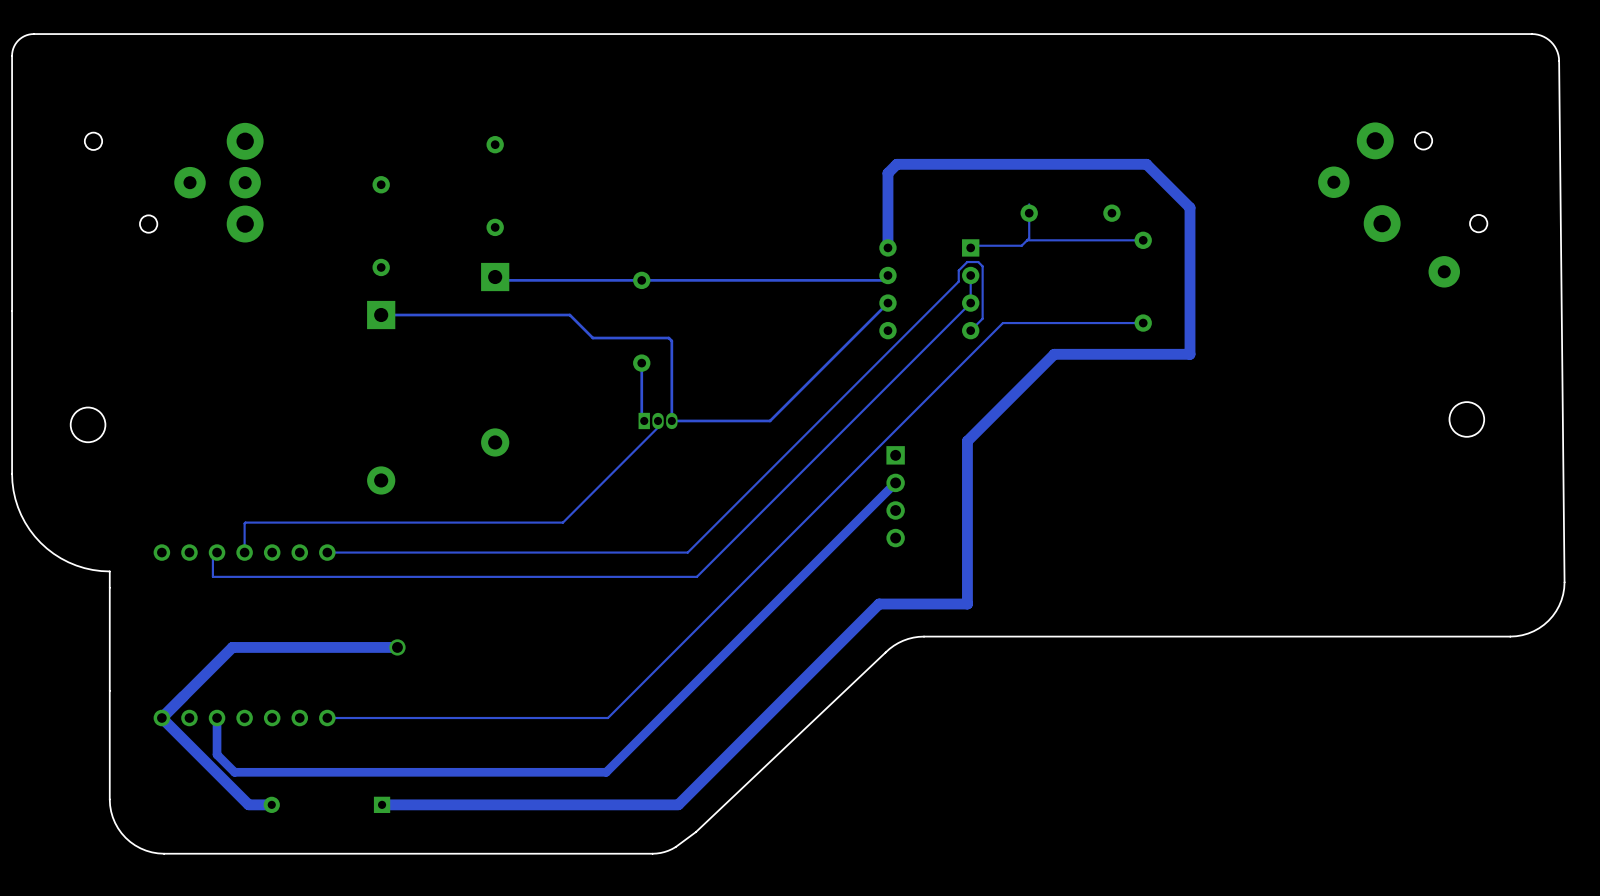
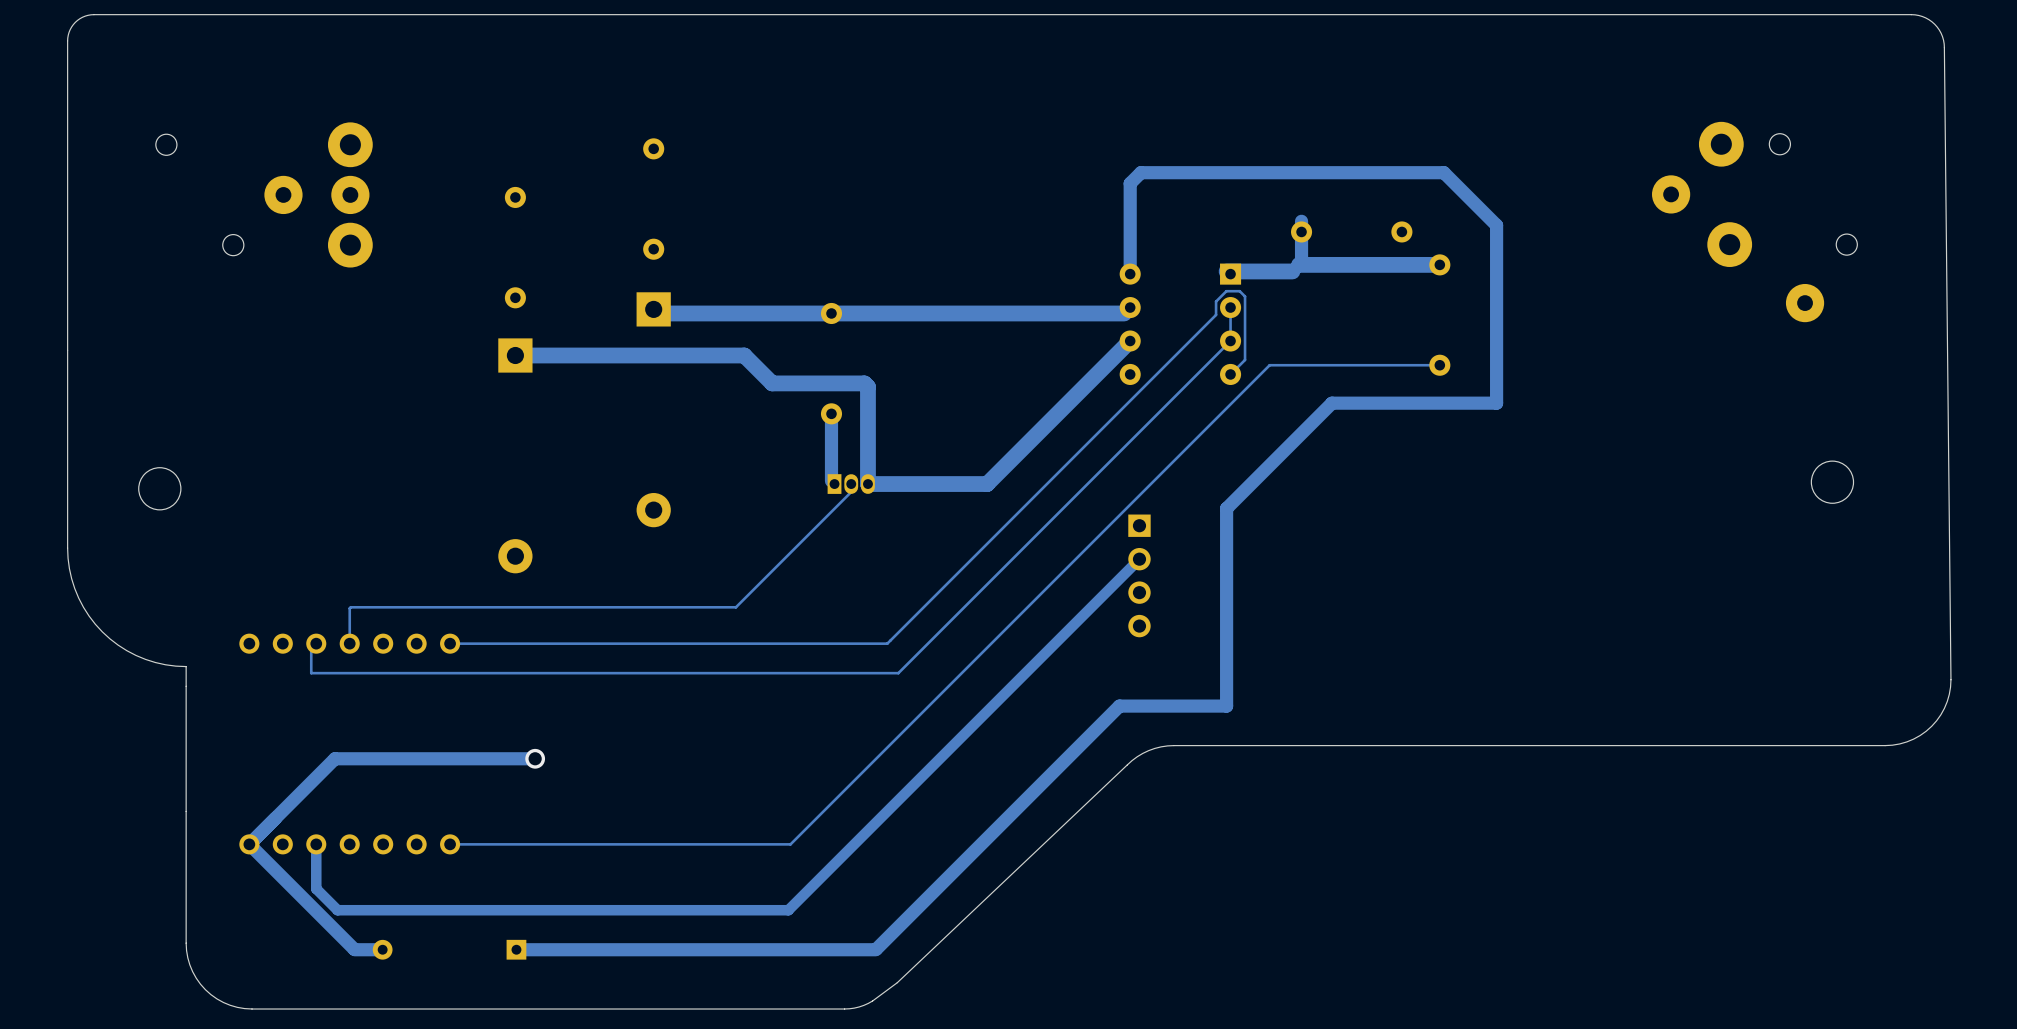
track width: thin (1029, 204) (1029, 238) -> thick (1301, 221) (1301, 262)
track width: thin (1143, 240) (1027, 240) -> thick (1439, 264) (1299, 264)
track width: thin (1021, 245) (967, 245) -> thick (1292, 271) (1226, 271)
track width: thin (883, 280) (498, 280) -> thick (1124, 313) (657, 313)
track width: thin (887, 303) (770, 420) (671, 420) (671, 340) (668, 338) (592, 338) (569, 315) (381, 315) -> thick (1130, 341) (987, 484) (867, 484) (867, 386) (864, 383) (772, 383) (744, 355) (515, 355)
track width: thin (641, 363) (641, 418) -> thick (831, 413) (831, 481)

